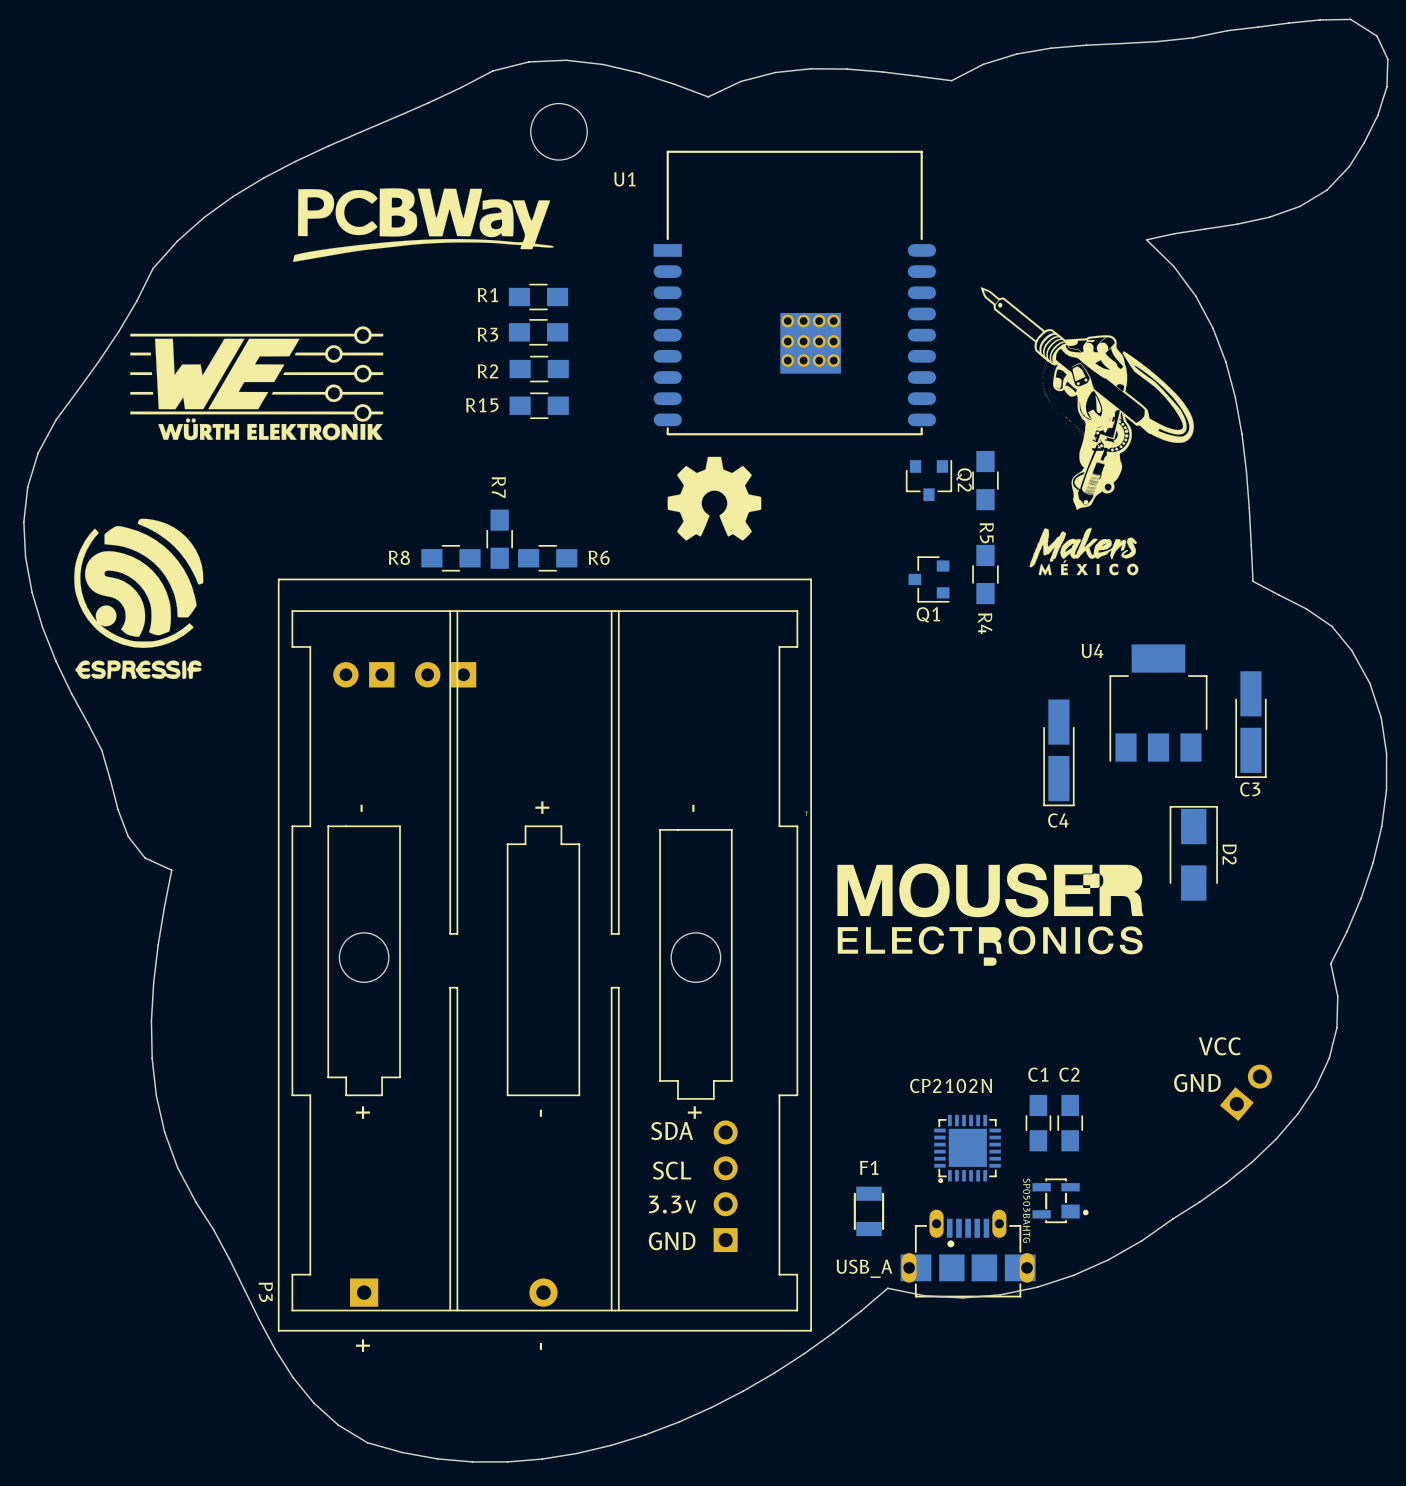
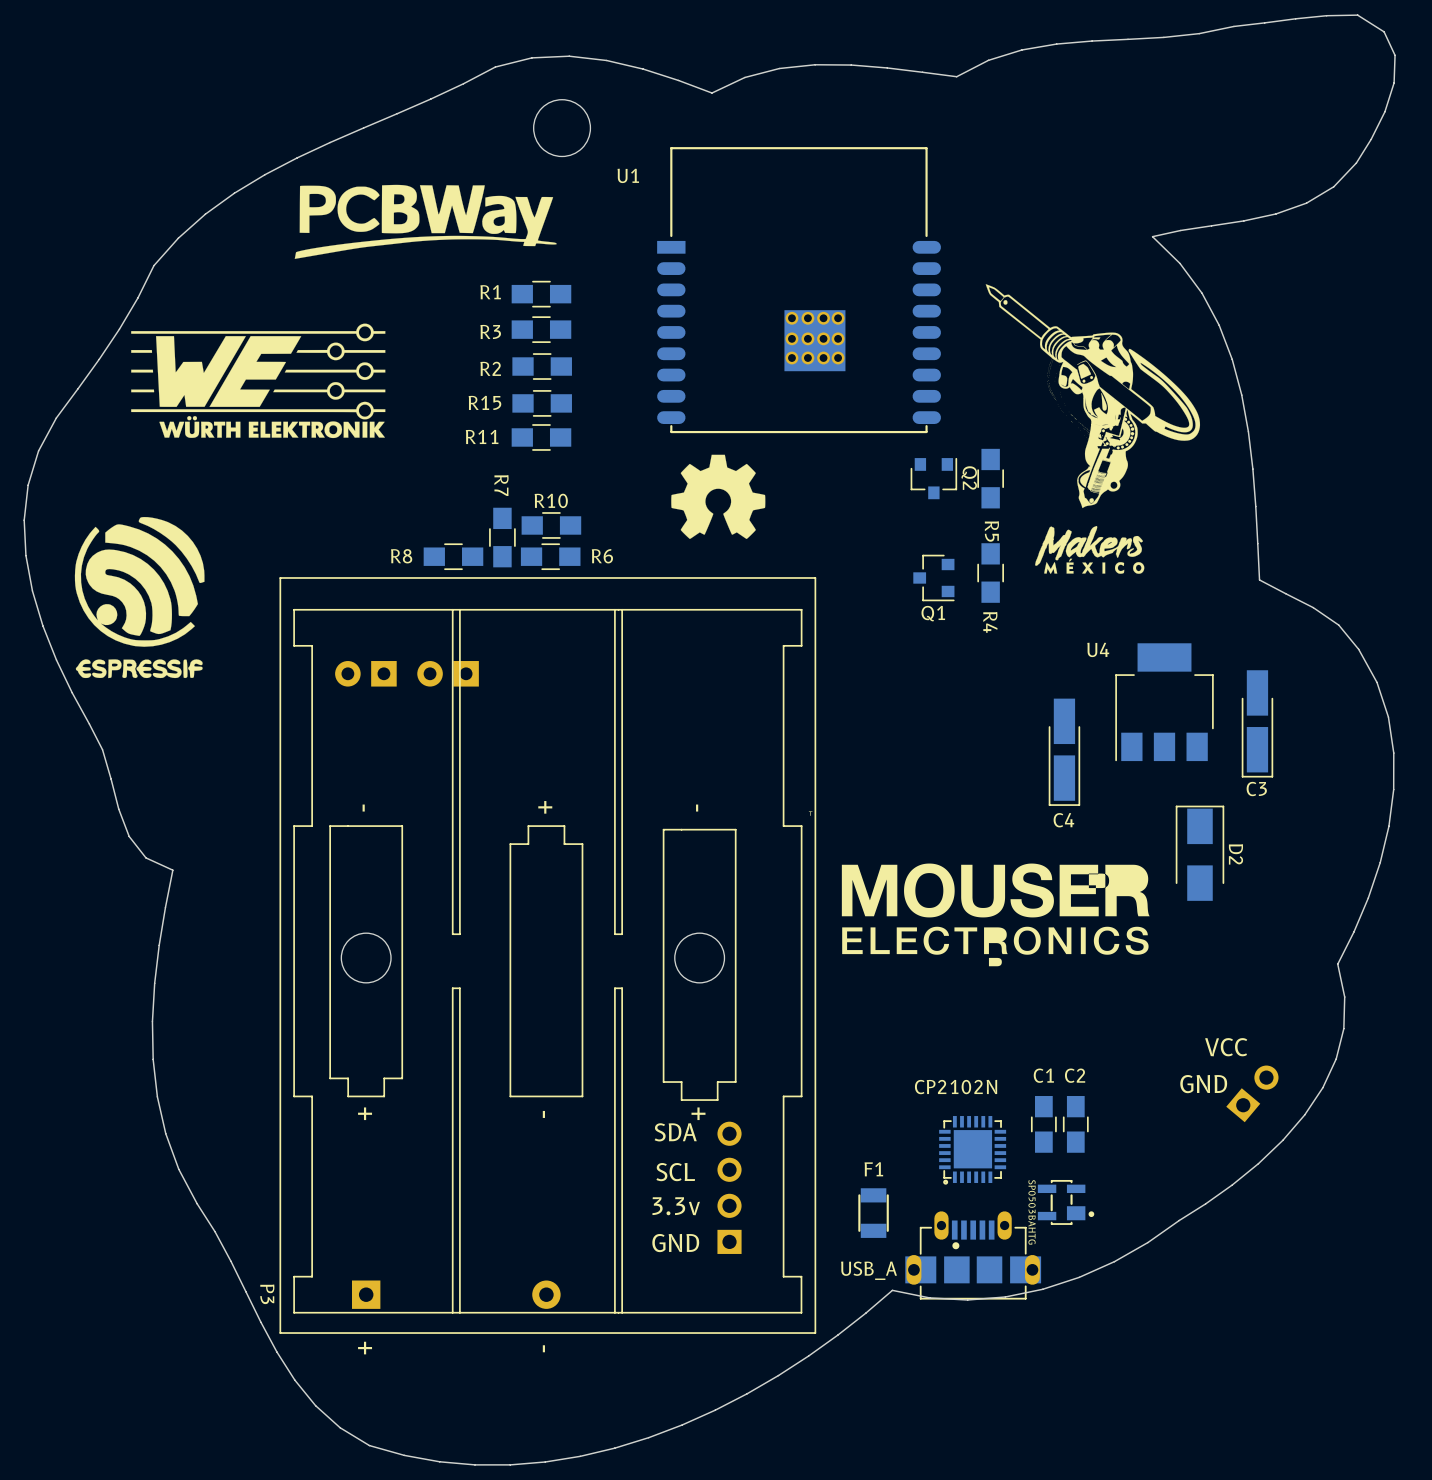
R11: none -> (541, 437)
R10: none -> (551, 525)

